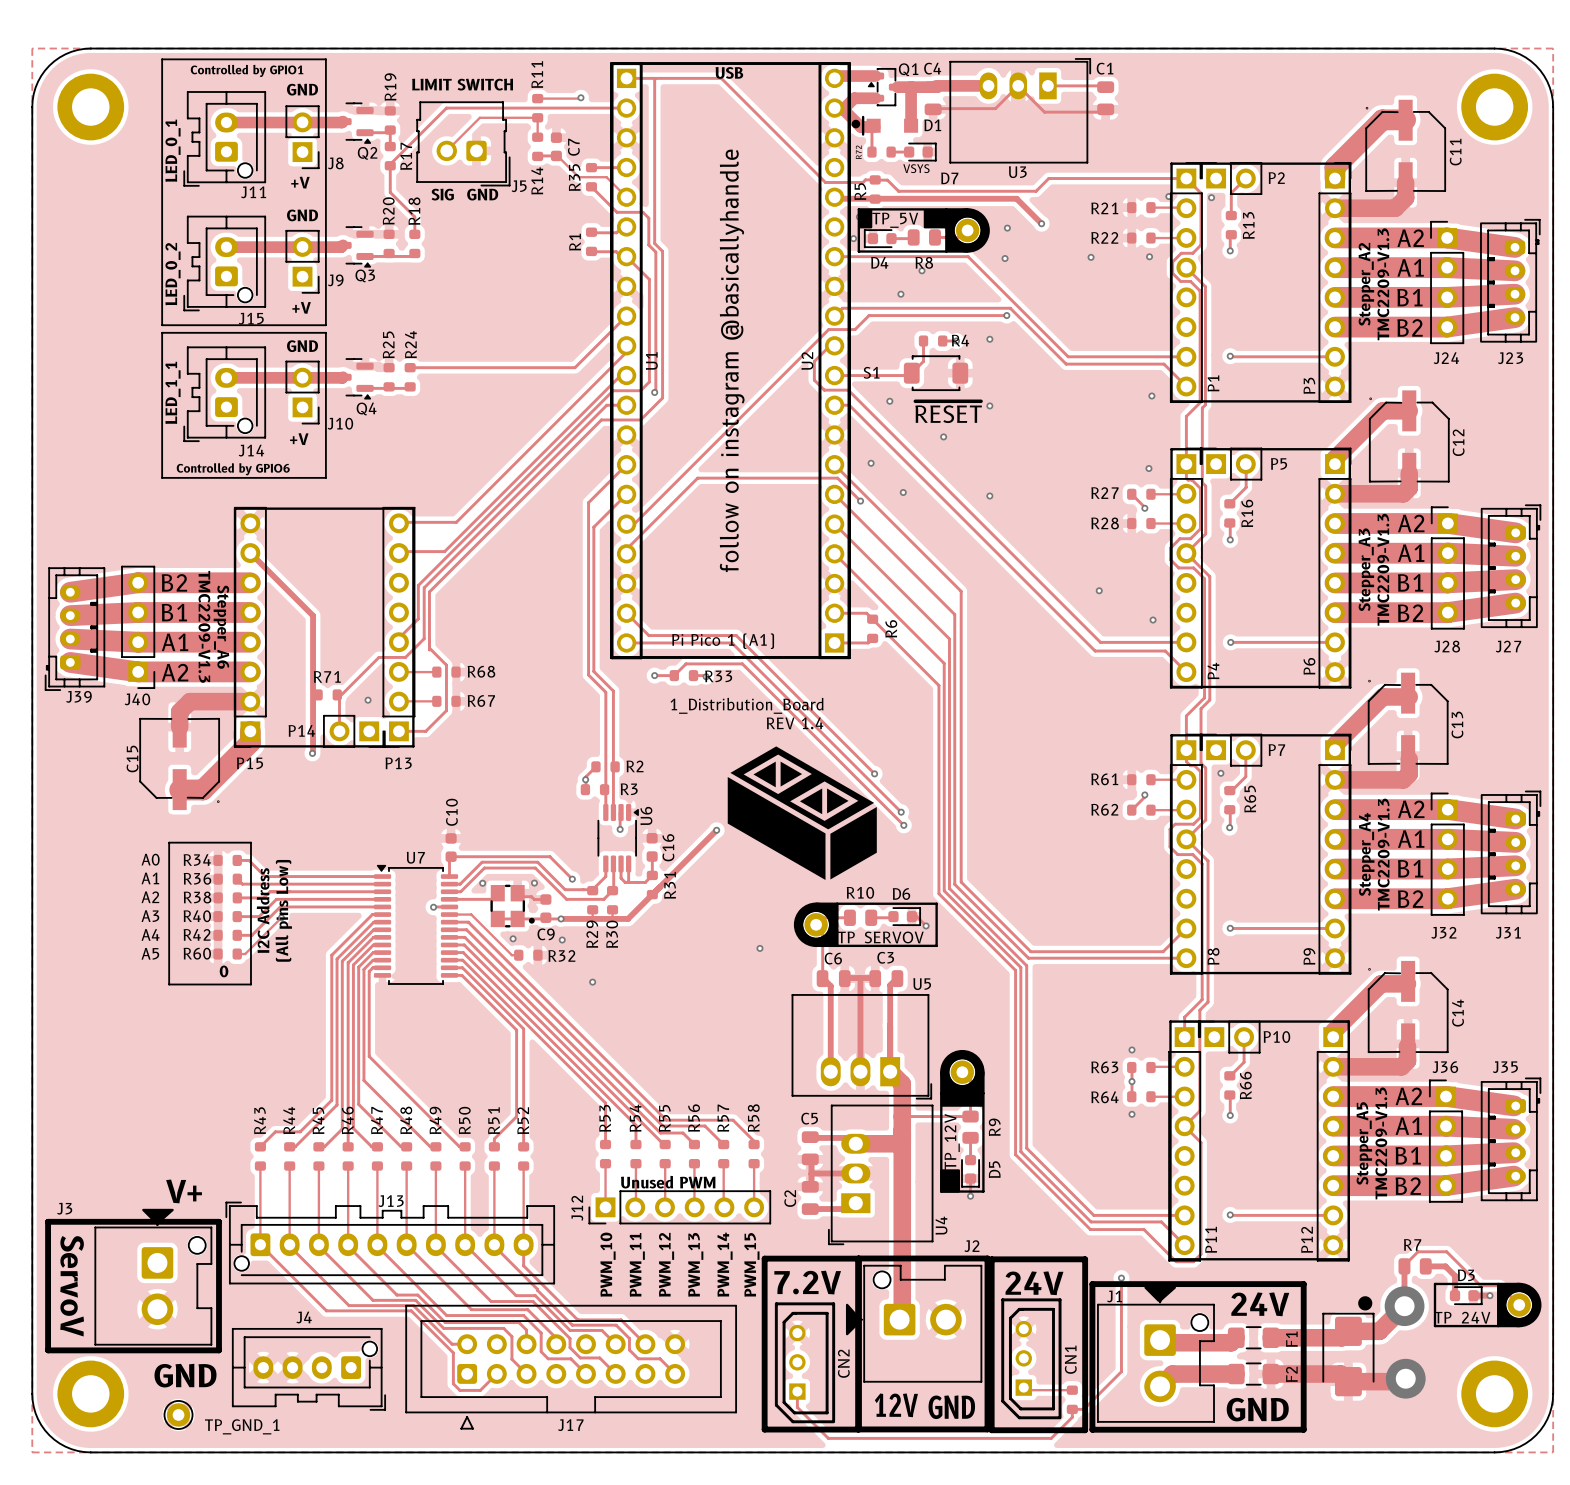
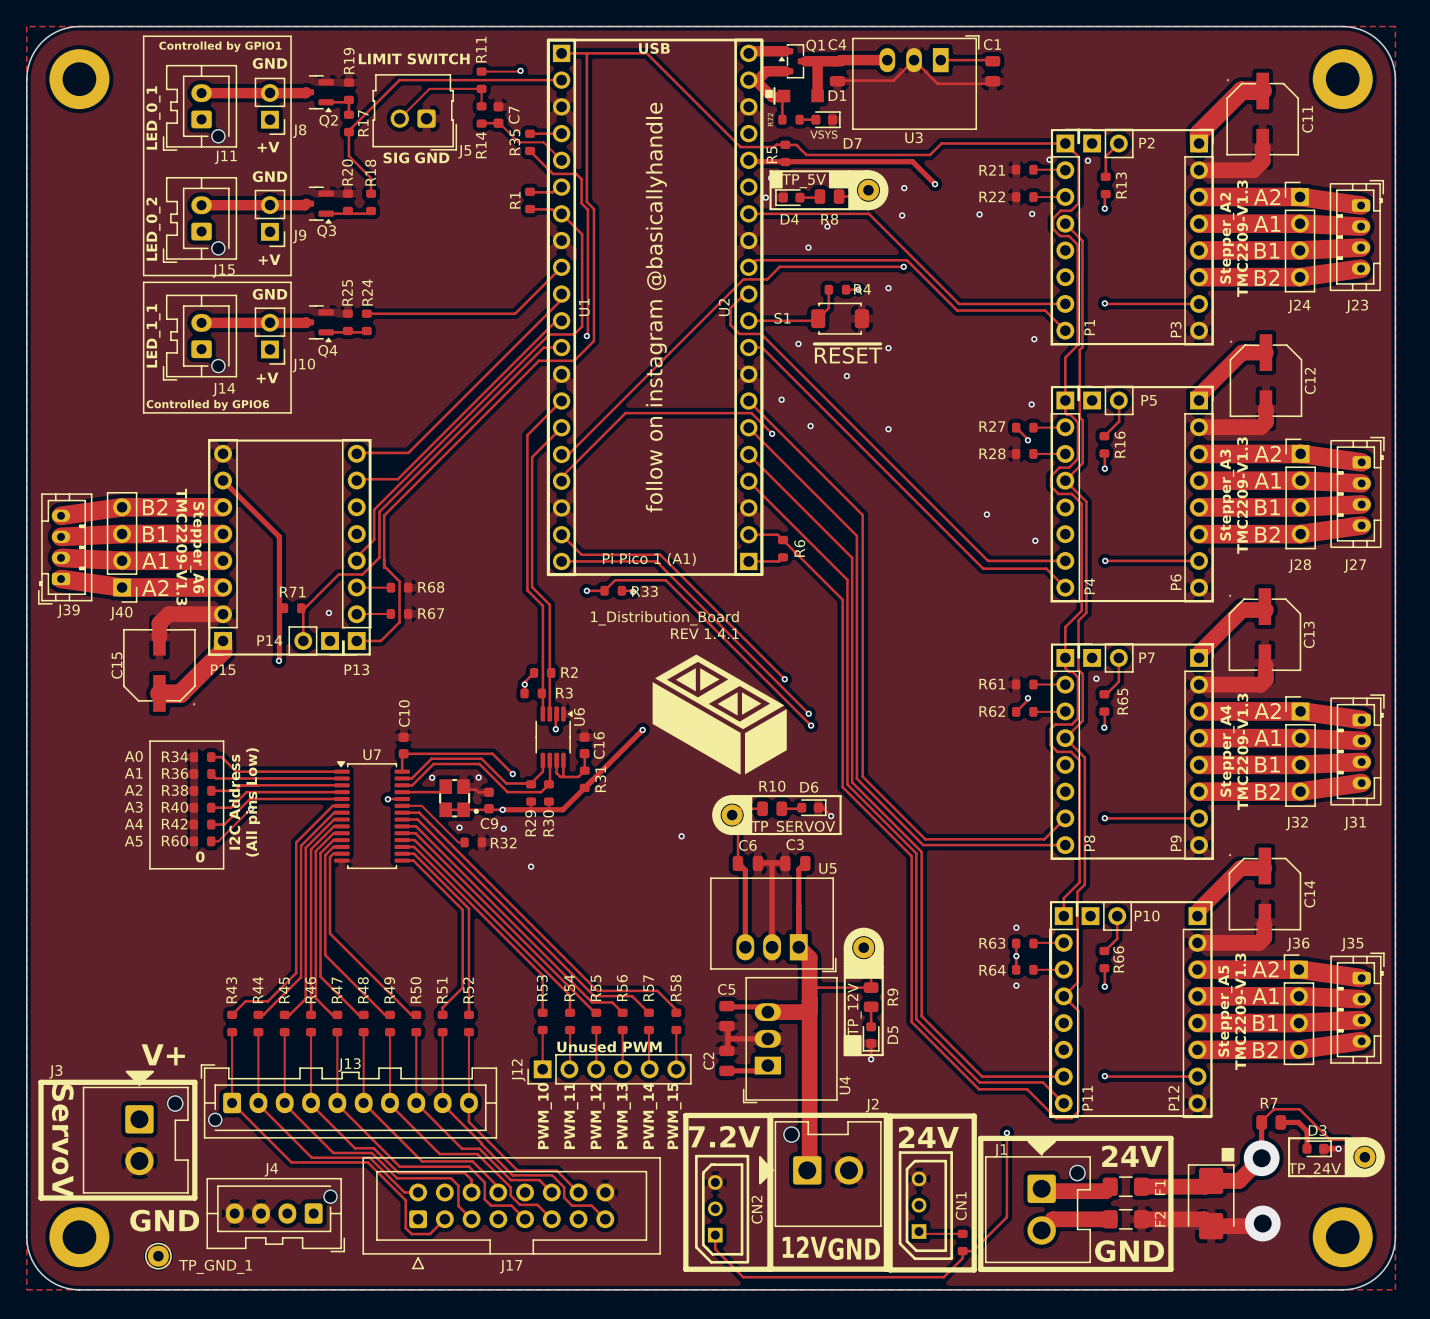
text: REV 1.4 (795, 723) -> REV 1.4.1 (704, 633)

